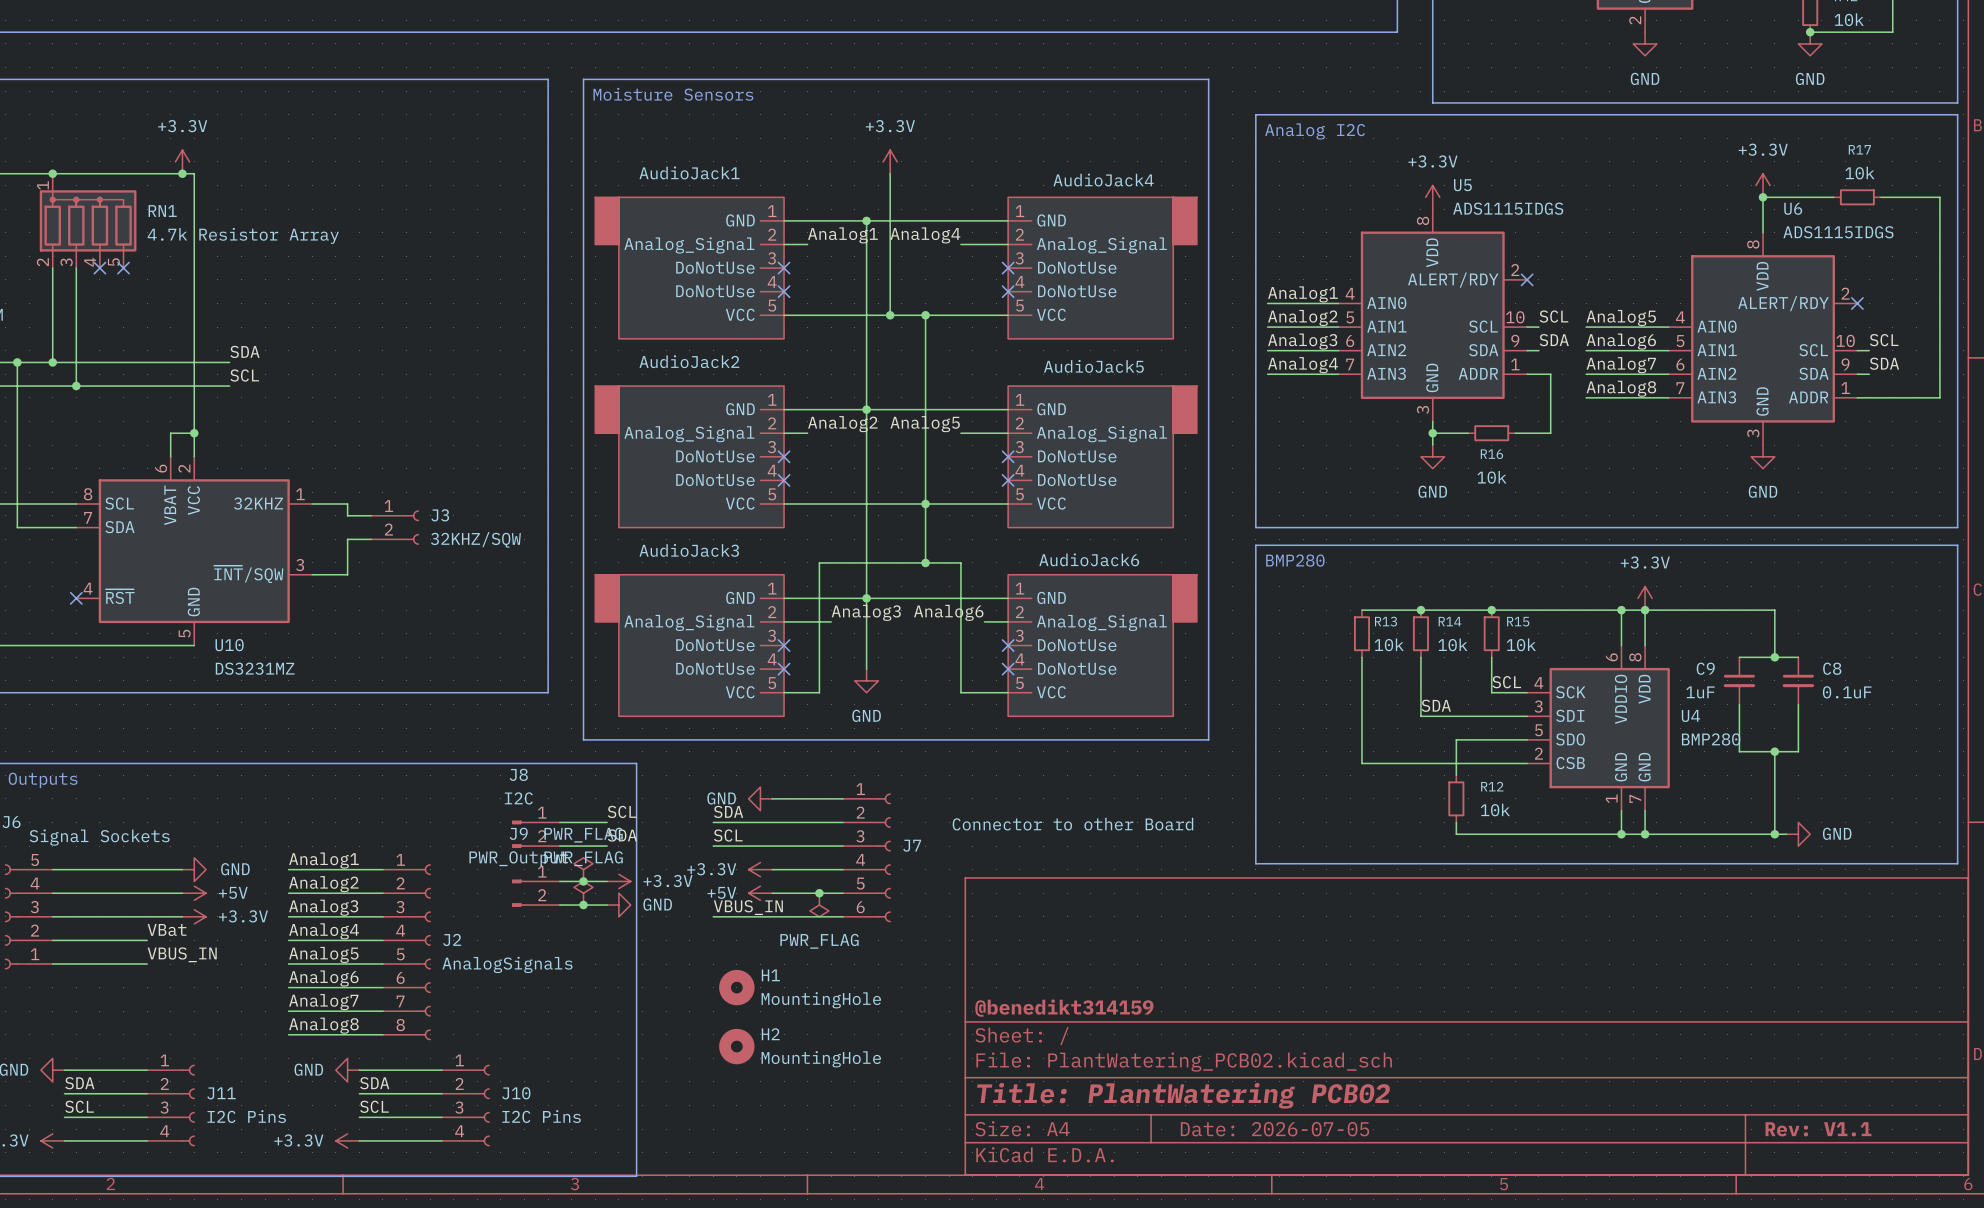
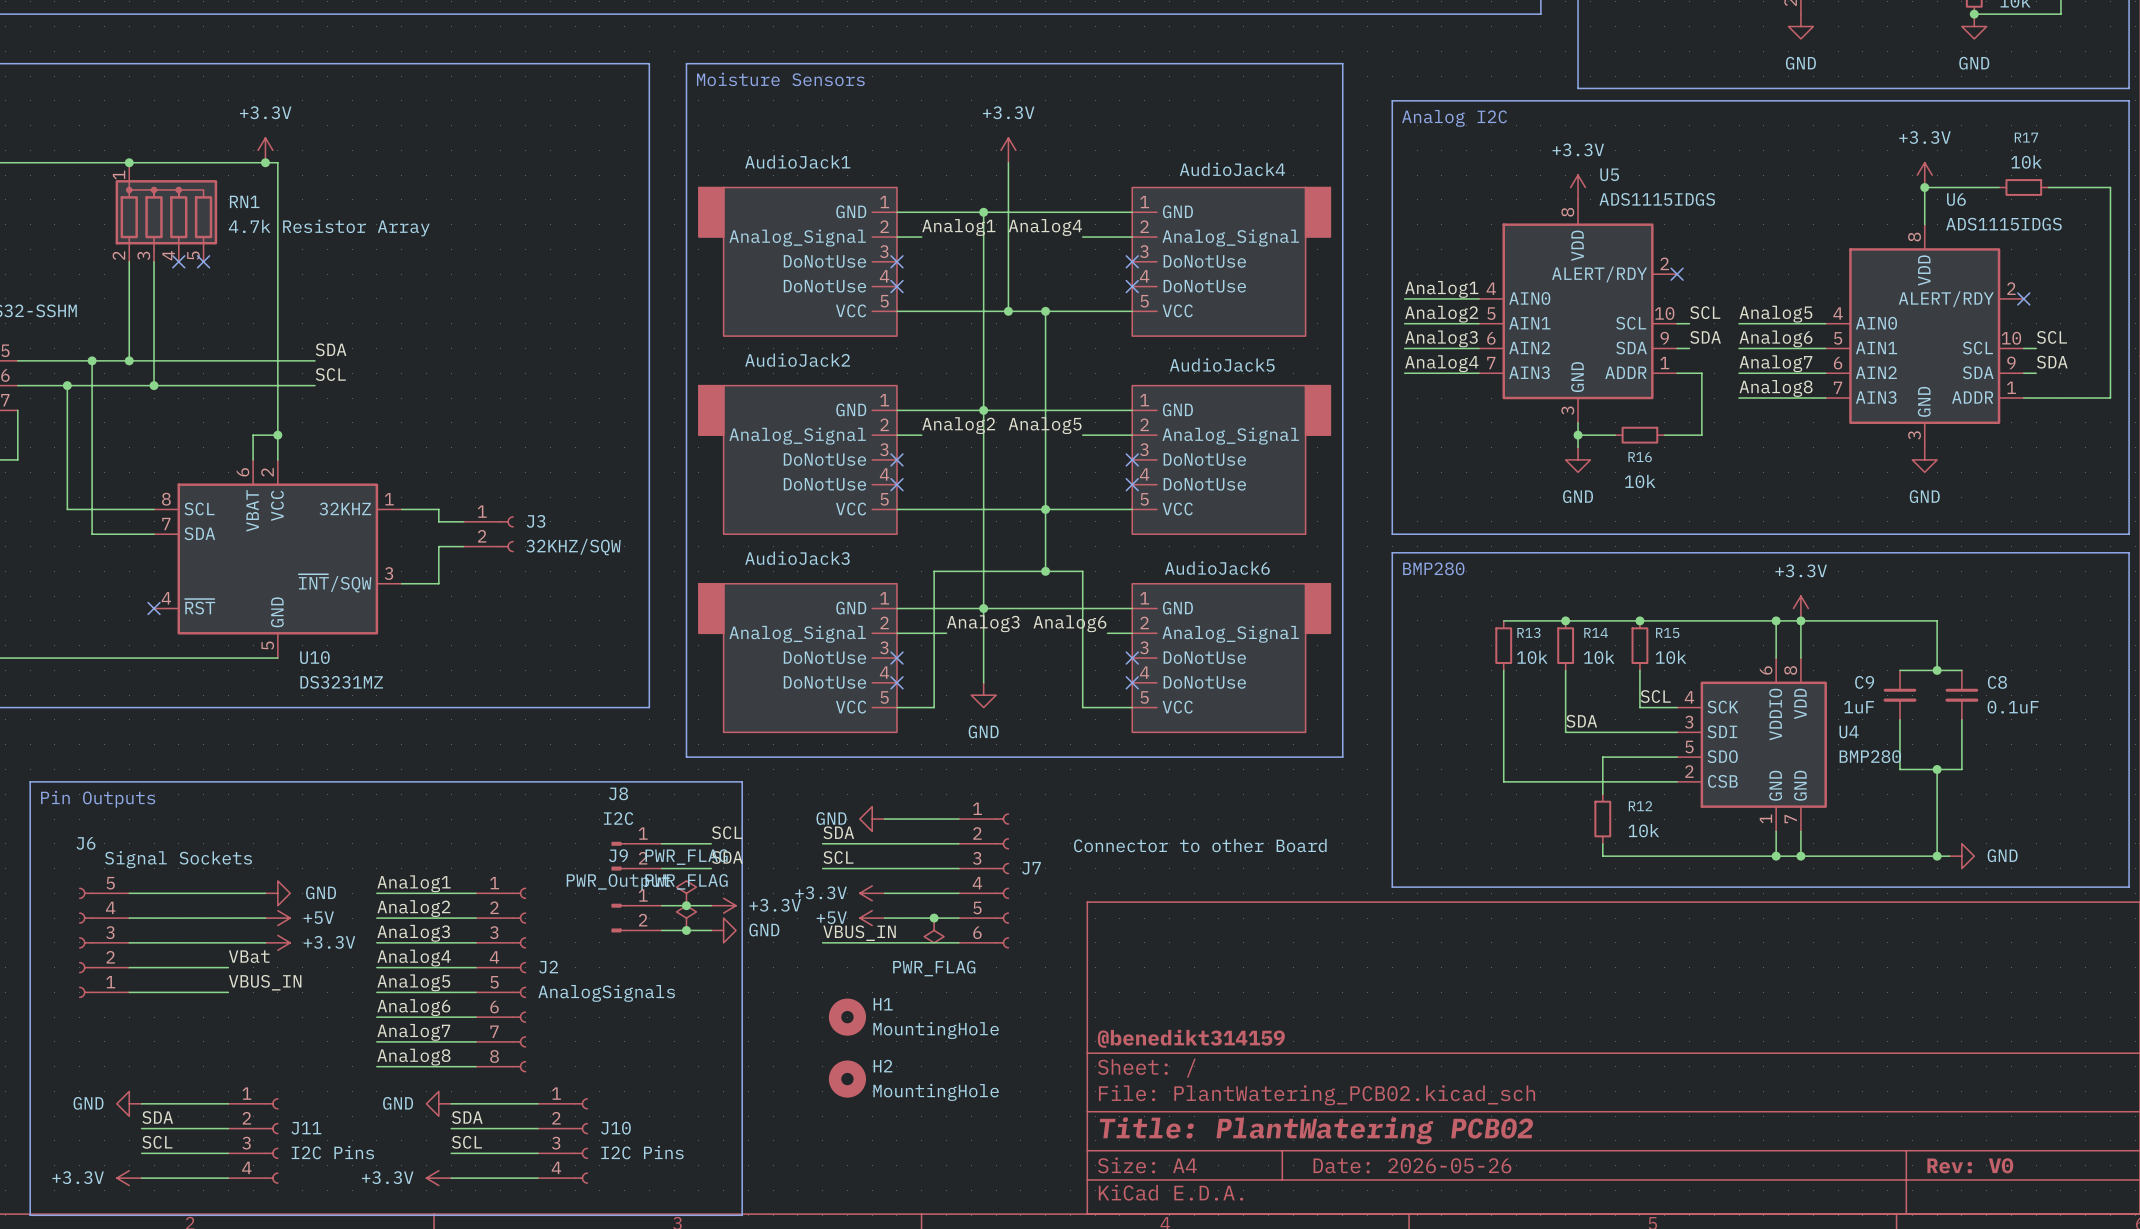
title block: Date: 2026-07-05 (1275, 1129) -> Date: 2026-05-26 (1412, 1165)
title block: Rev: V1.1 (1818, 1129) -> Rev: V0 (1970, 1165)

